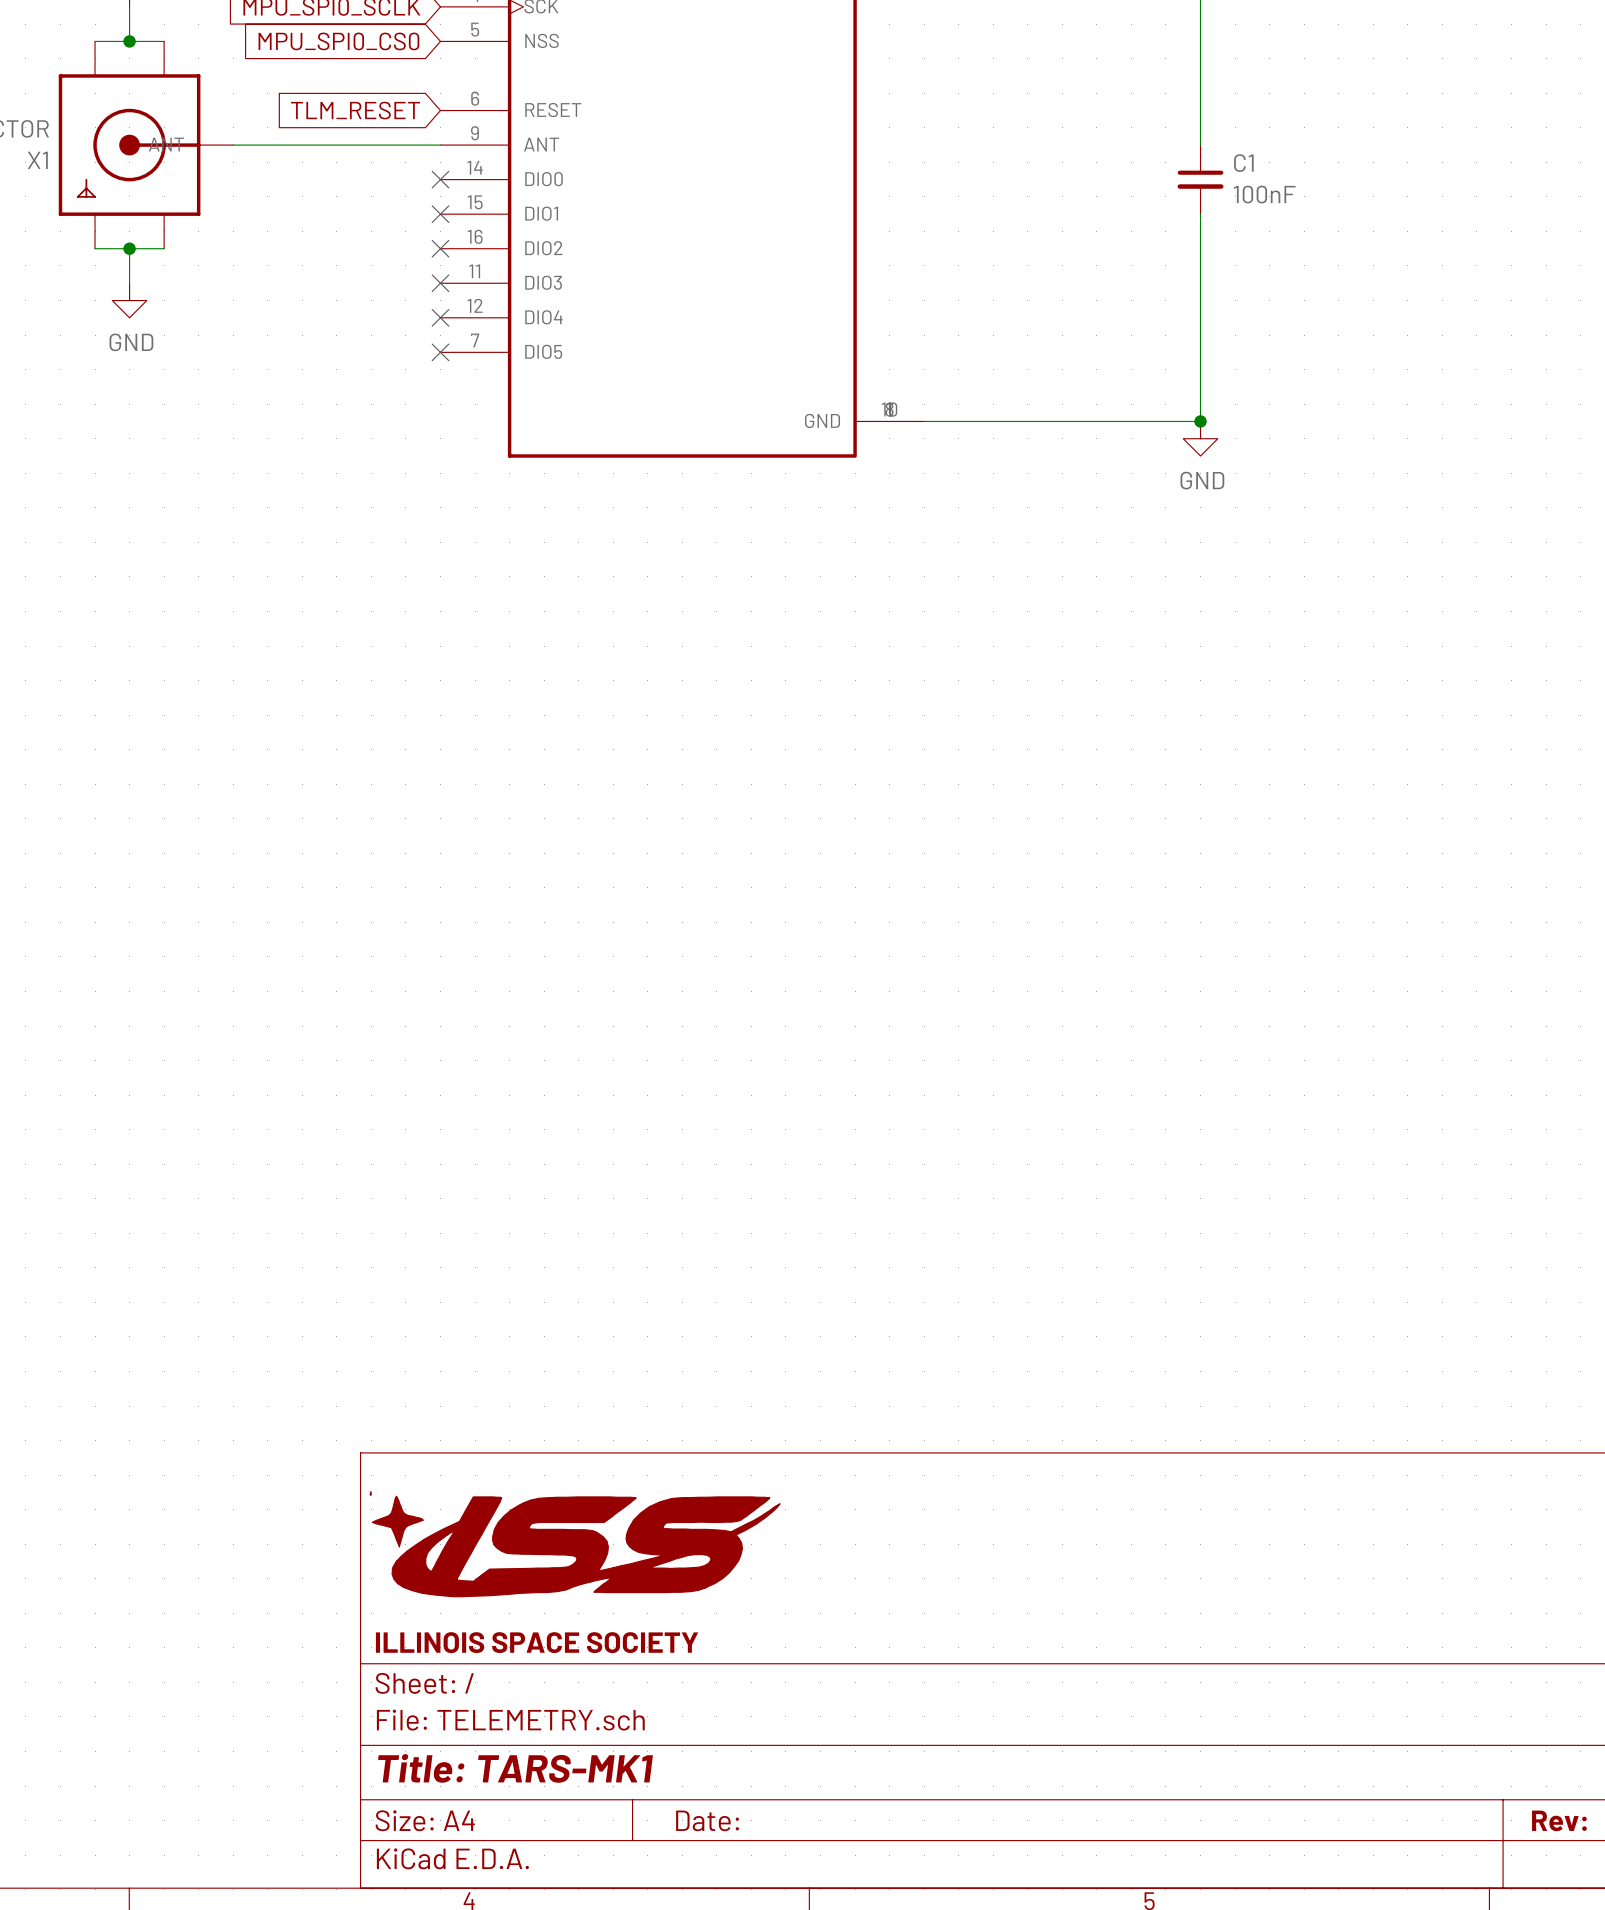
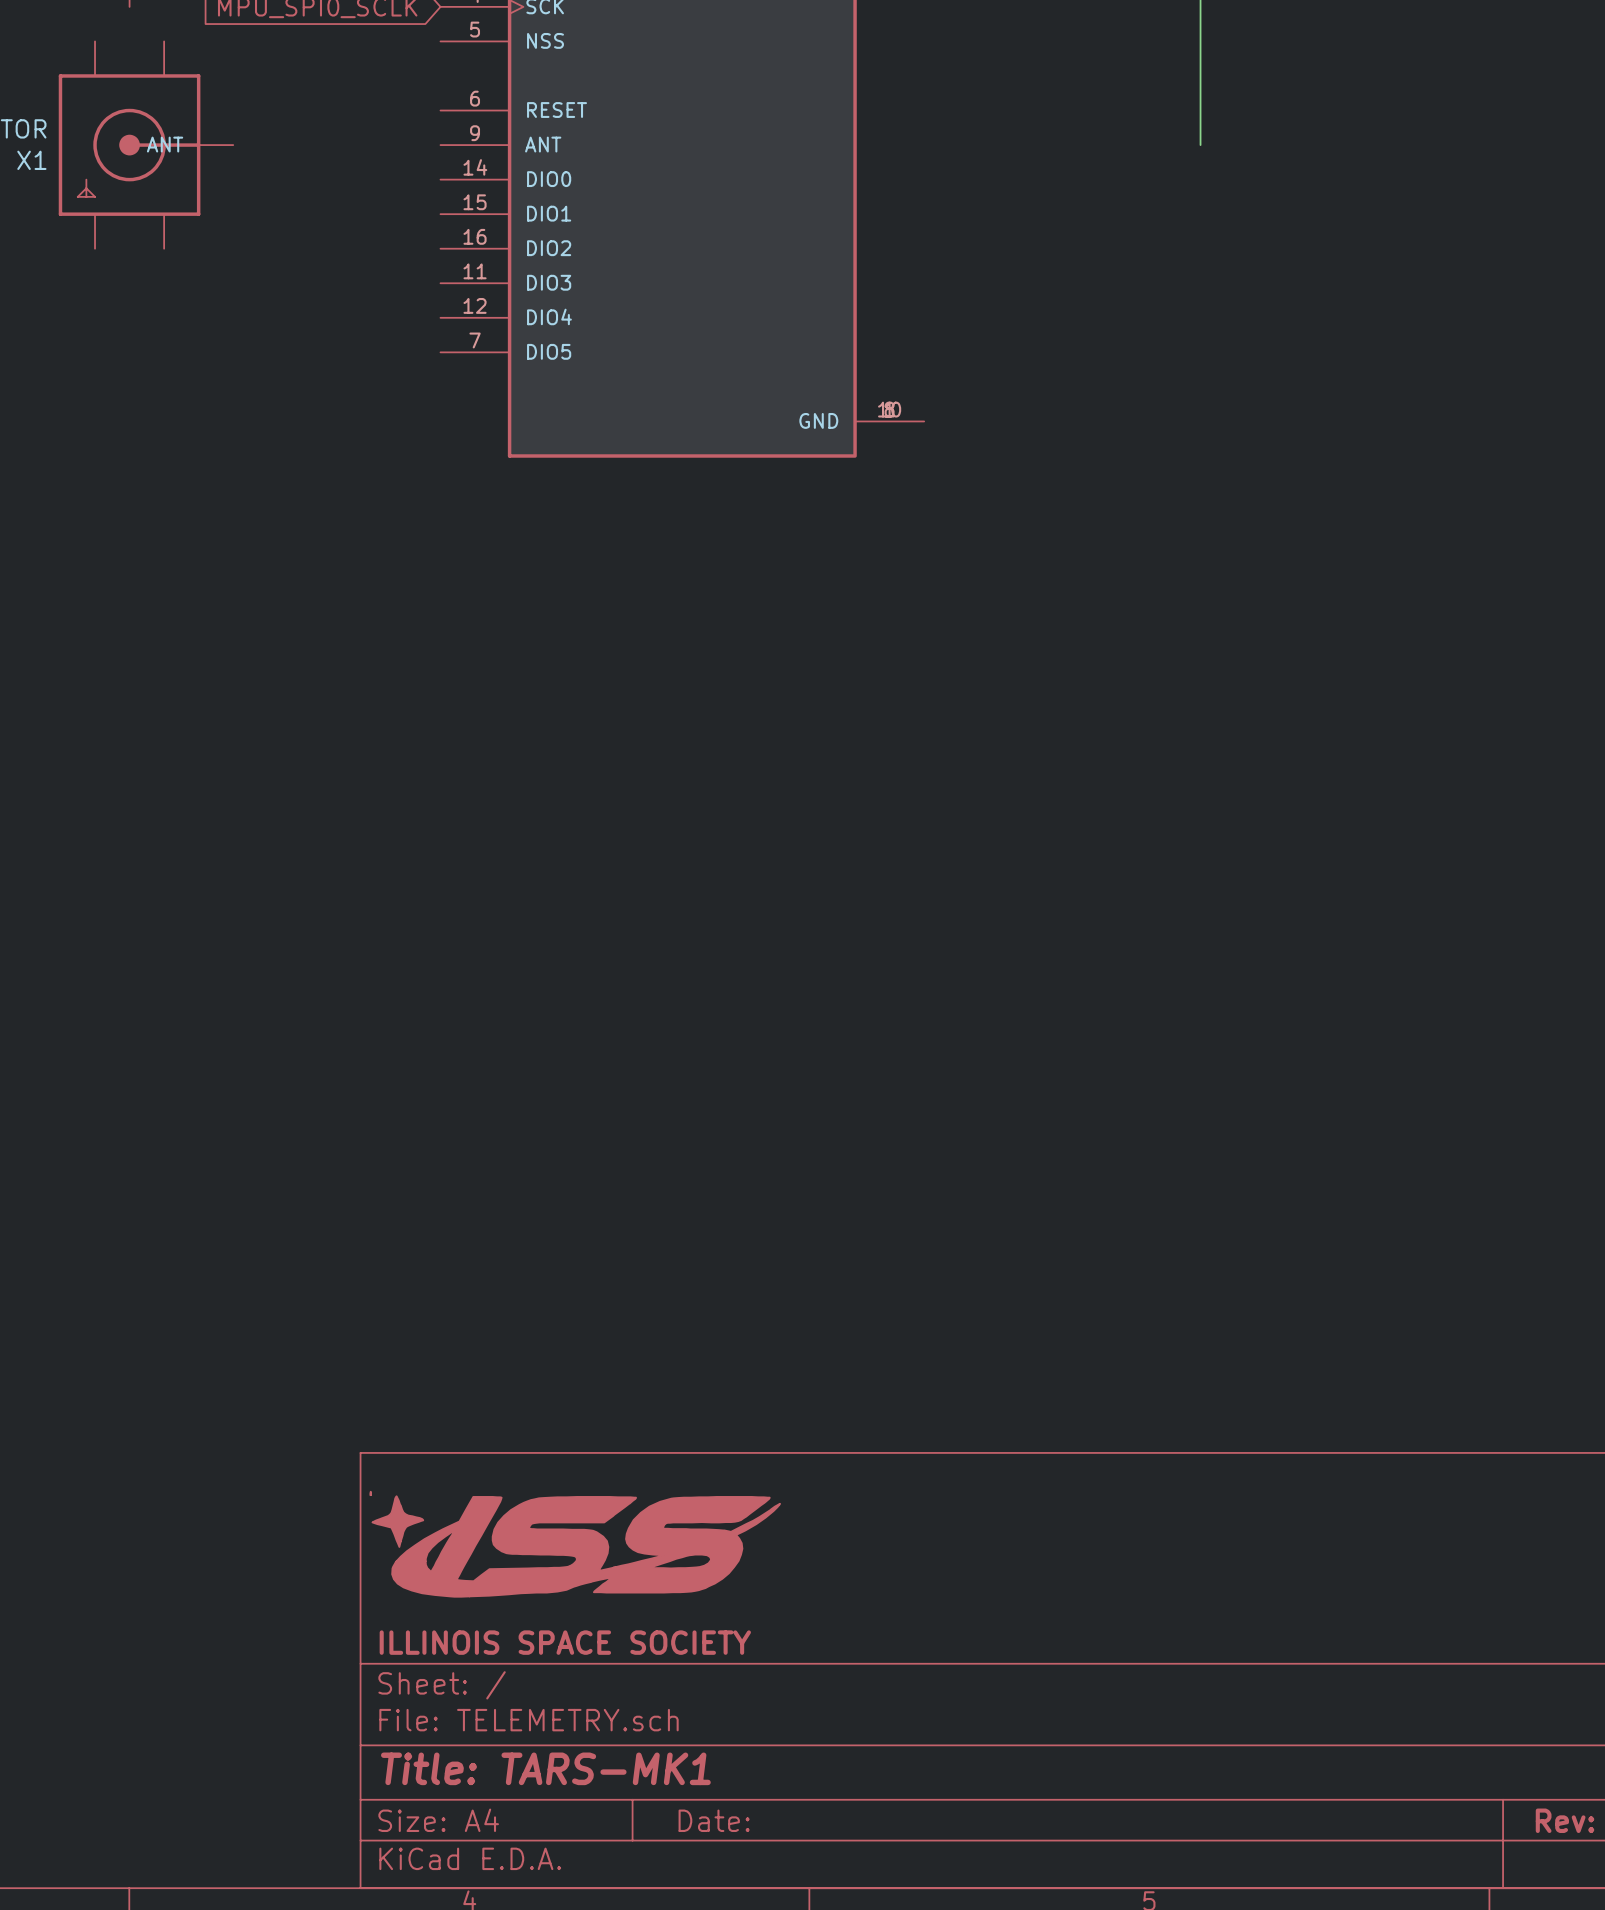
wire: (129, 6) (129, 41) -> none
wire: (95, 41) (164, 41) -> none
junction: (129, 41) -> none
global label: MPU_SPI0_CS0 (338, 41) -> none
global label: TLM_RESET (355, 110) -> none
wire: (233, 145) (440, 145) -> none
no-connect mark: (440, 179) -> none
C1: 100nF (1200, 179) -> none
no-connect mark: (440, 214) -> none
wire: (1200, 214) (1200, 421) (924, 421) -> none
wire: (95, 248) (164, 248) -> none
wire: (129, 248) (129, 283) -> none
junction: (129, 248) -> none
no-connect mark: (440, 248) -> none
no-connect mark: (440, 283) -> none
power symbol: GND (129, 300) -> none
no-connect mark: (440, 317) -> none
no-connect mark: (440, 352) -> none
junction: (1200, 421) -> none
power symbol: GND (1200, 438) -> none

